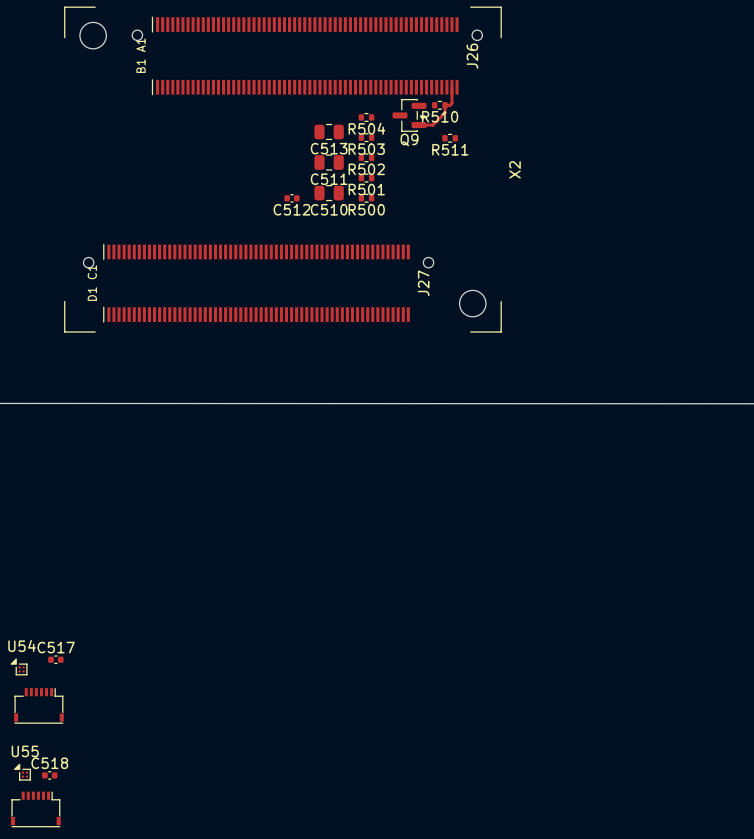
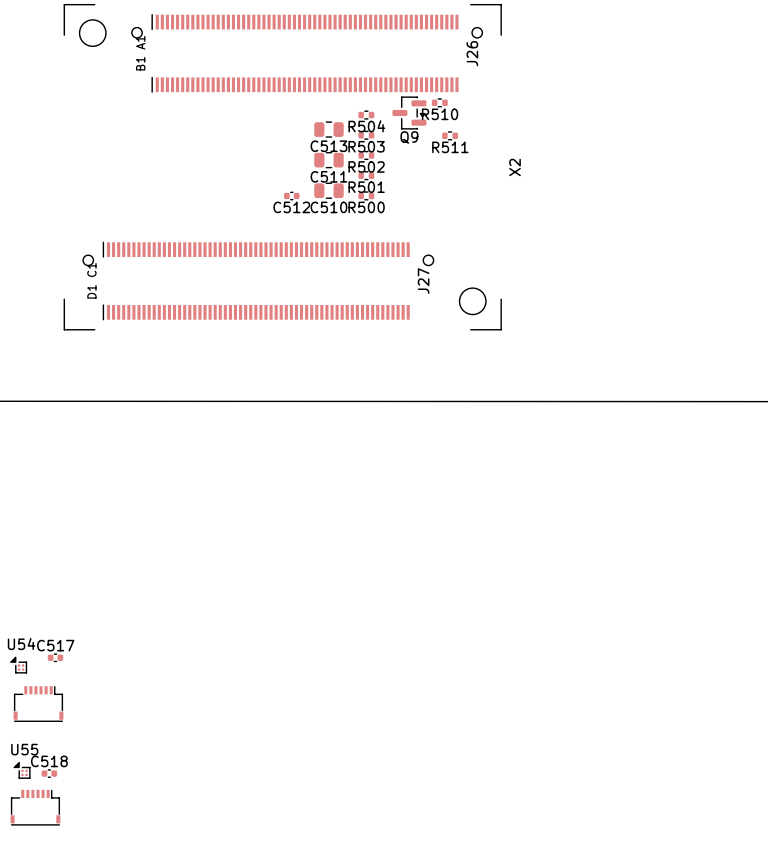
top track: (451, 87) (451, 103) (445, 105) (445, 112) (432, 125) (419, 125) -> none

